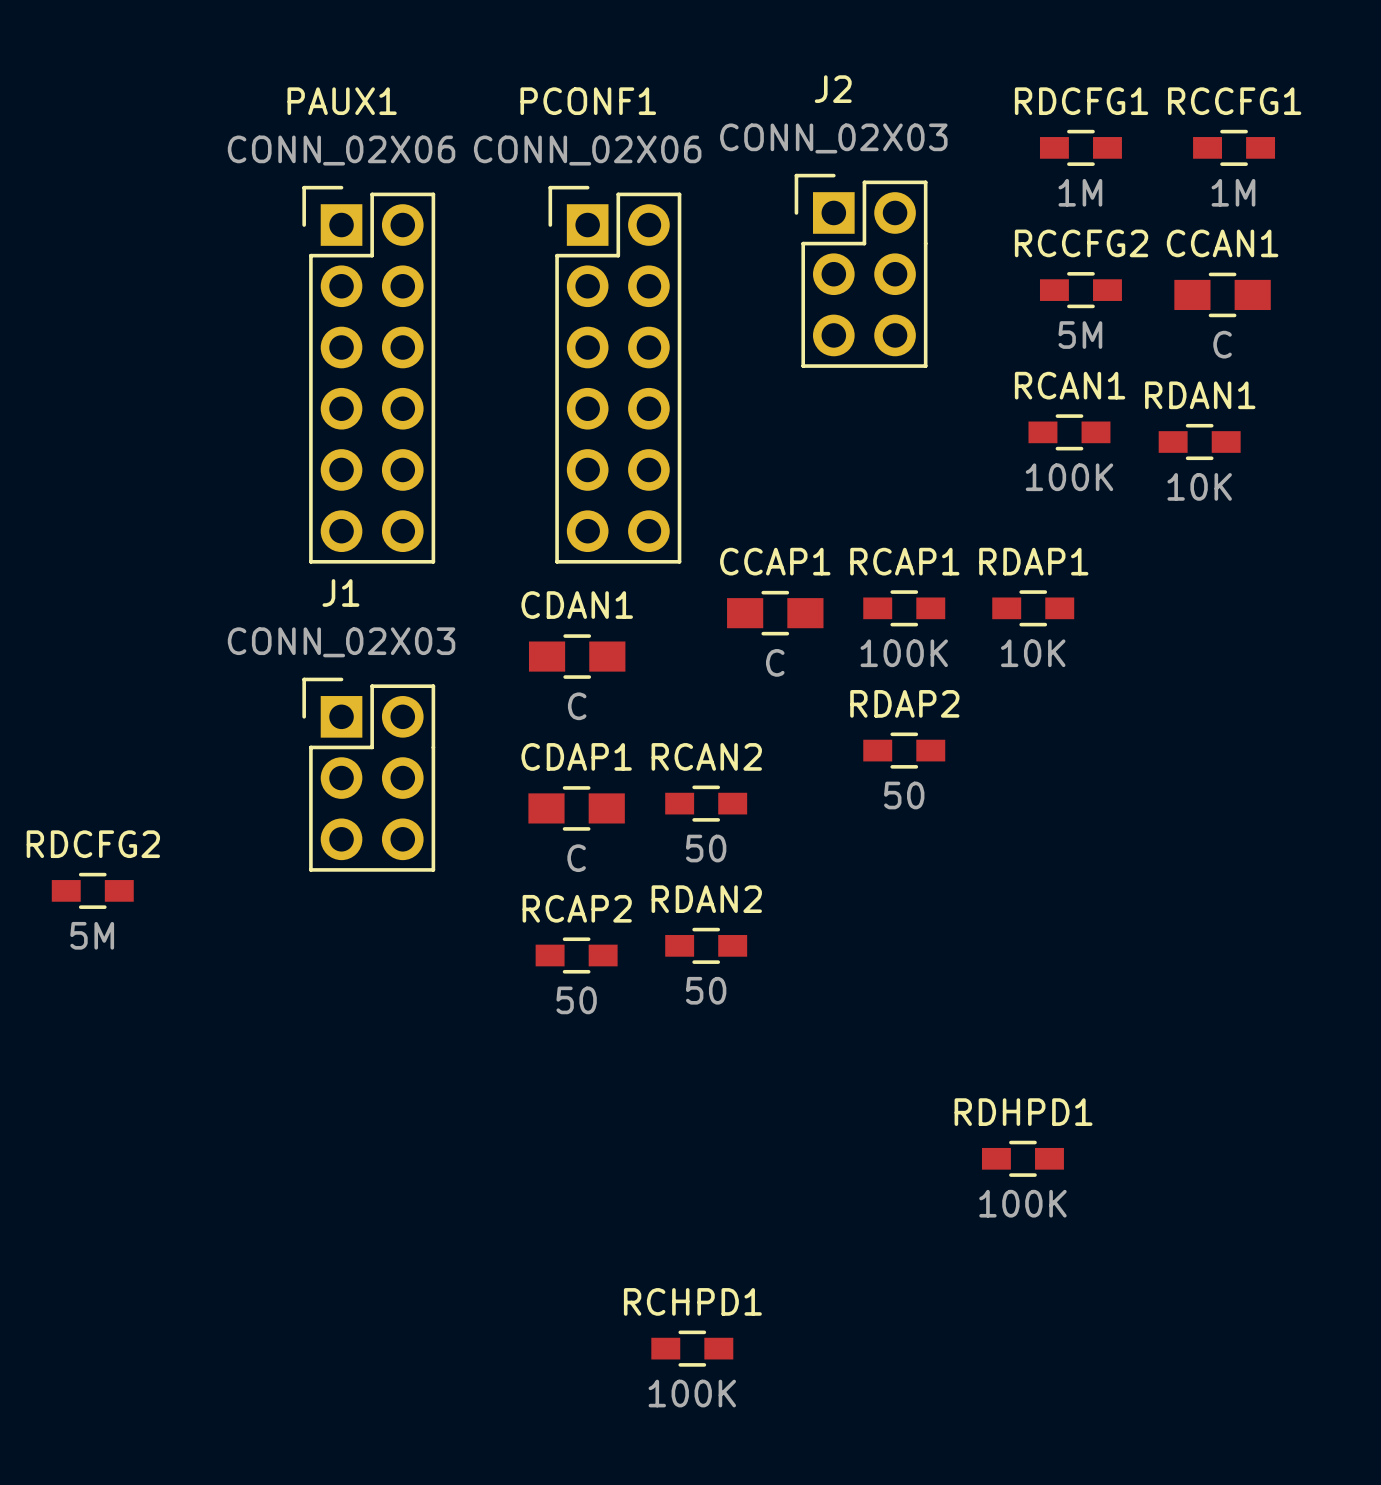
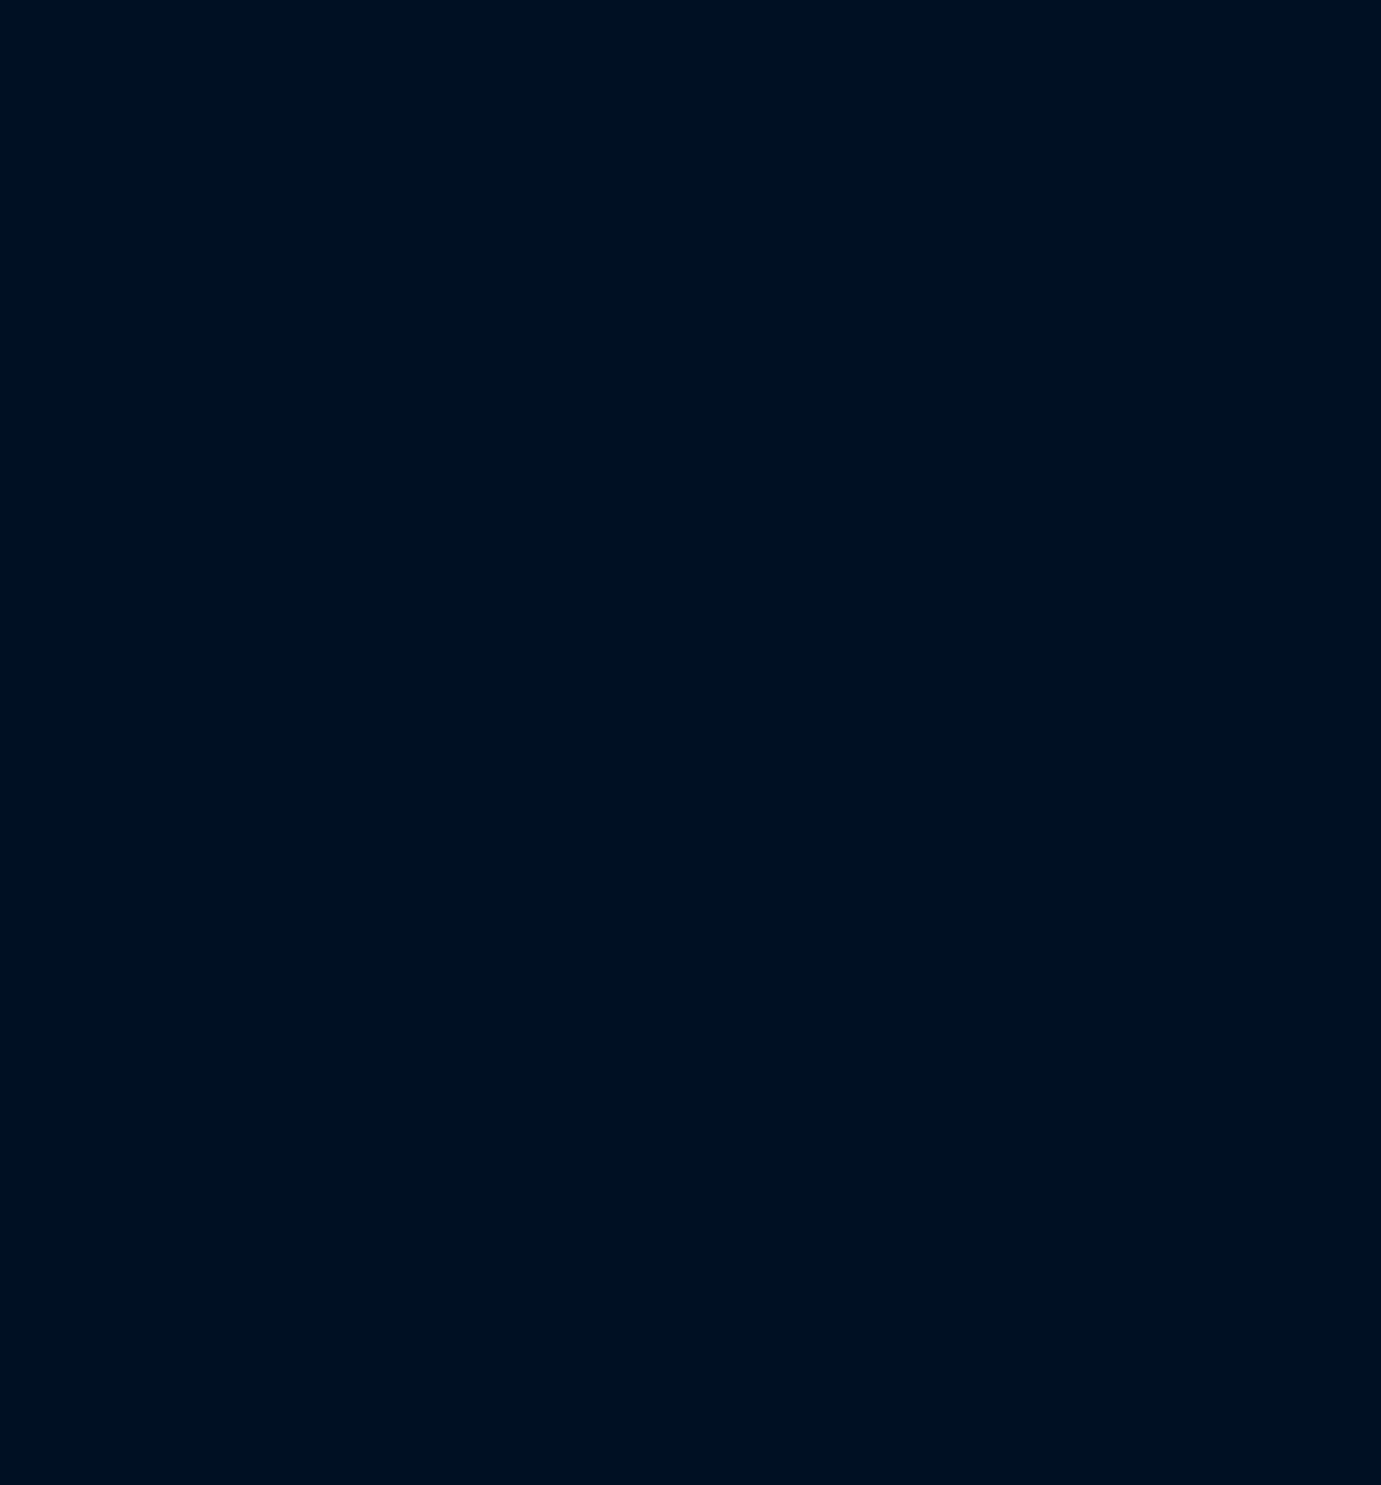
RDCFG1: 1M (1080, 147) -> none
RCCFG1: 1M (1234, 147) -> none
J2: CONN_02X03 (861, 270) -> none
RCCFG2: 5M (1080, 290) -> none
CCAN1: C (1222, 294) -> none
PAUX1: CONN_02X06 (368, 374) -> none
PCONF1: CONN_02X06 (614, 374) -> none
RCAN1: 100K (1069, 432) -> none
RDAN1: 10K (1199, 442) -> none
RCAP1: 100K (904, 608) -> none
RDAP1: 10K (1033, 608) -> none
CCAP1: C (775, 613) -> none
CDAN1: C (577, 656) -> none
RDAP2: 50 (904, 750) -> none
J1: CONN_02X03 (368, 774) -> none
RCAN2: 50 (706, 803) -> none
CDAP1: C (576, 808) -> none
RDCFG2: 5M (92, 890) -> none
RDAN2: 50 (706, 945) -> none
RCAP2: 50 (576, 955) -> none
RDHPD1: 100K (1022, 1158) -> none
RCHPD1: 100K (692, 1348) -> none

